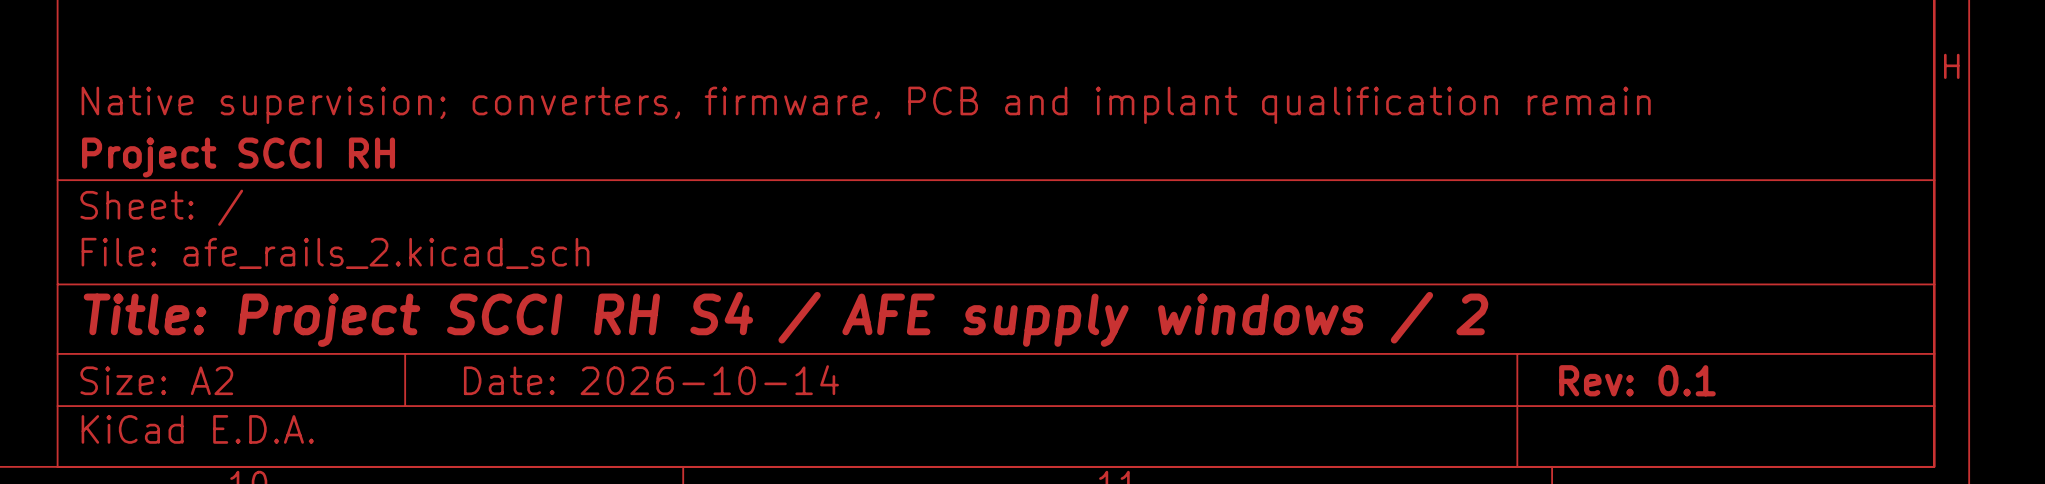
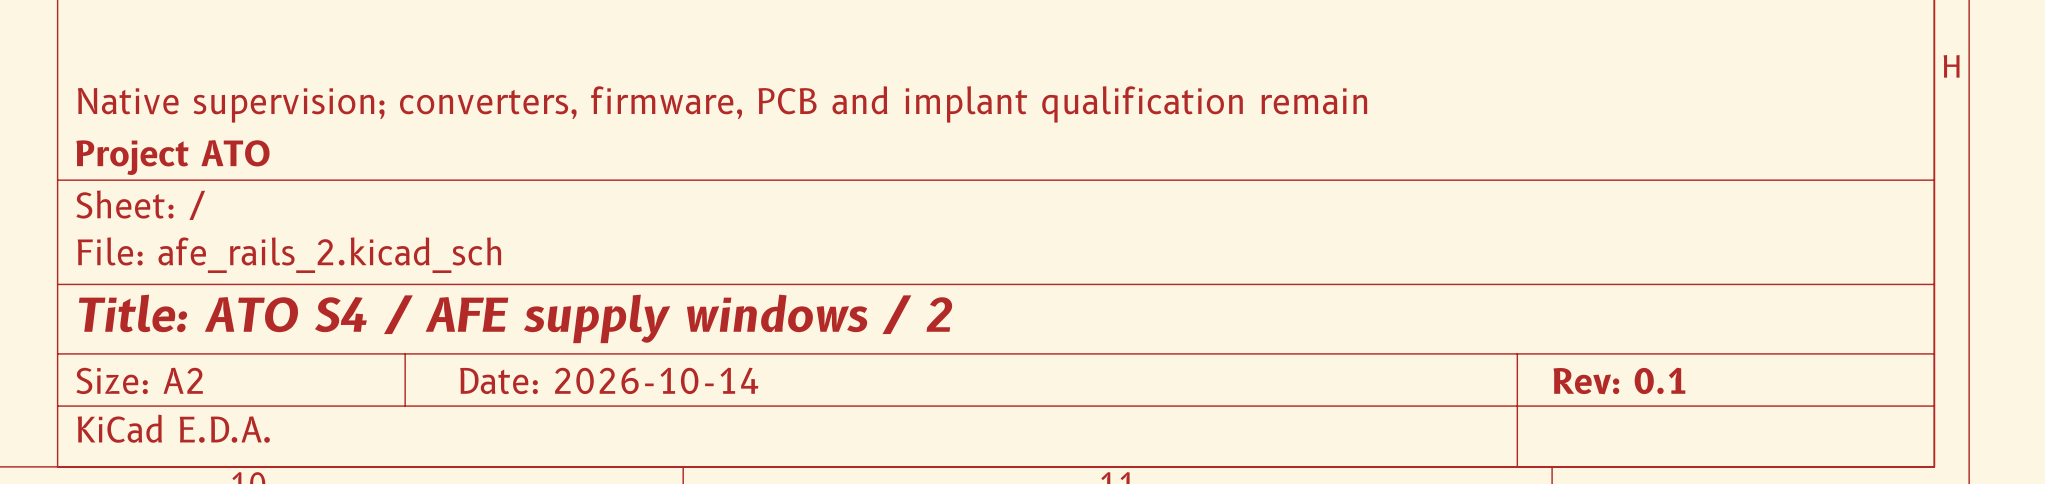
title block: Project SCCI RH (238, 157) -> Project ATO (172, 157)
title block: Title: Project SCCI RH S4 / AFE supply windows / 2 (786, 319) -> Title: ATO S4 / AFE supply windows / 2 (515, 318)

